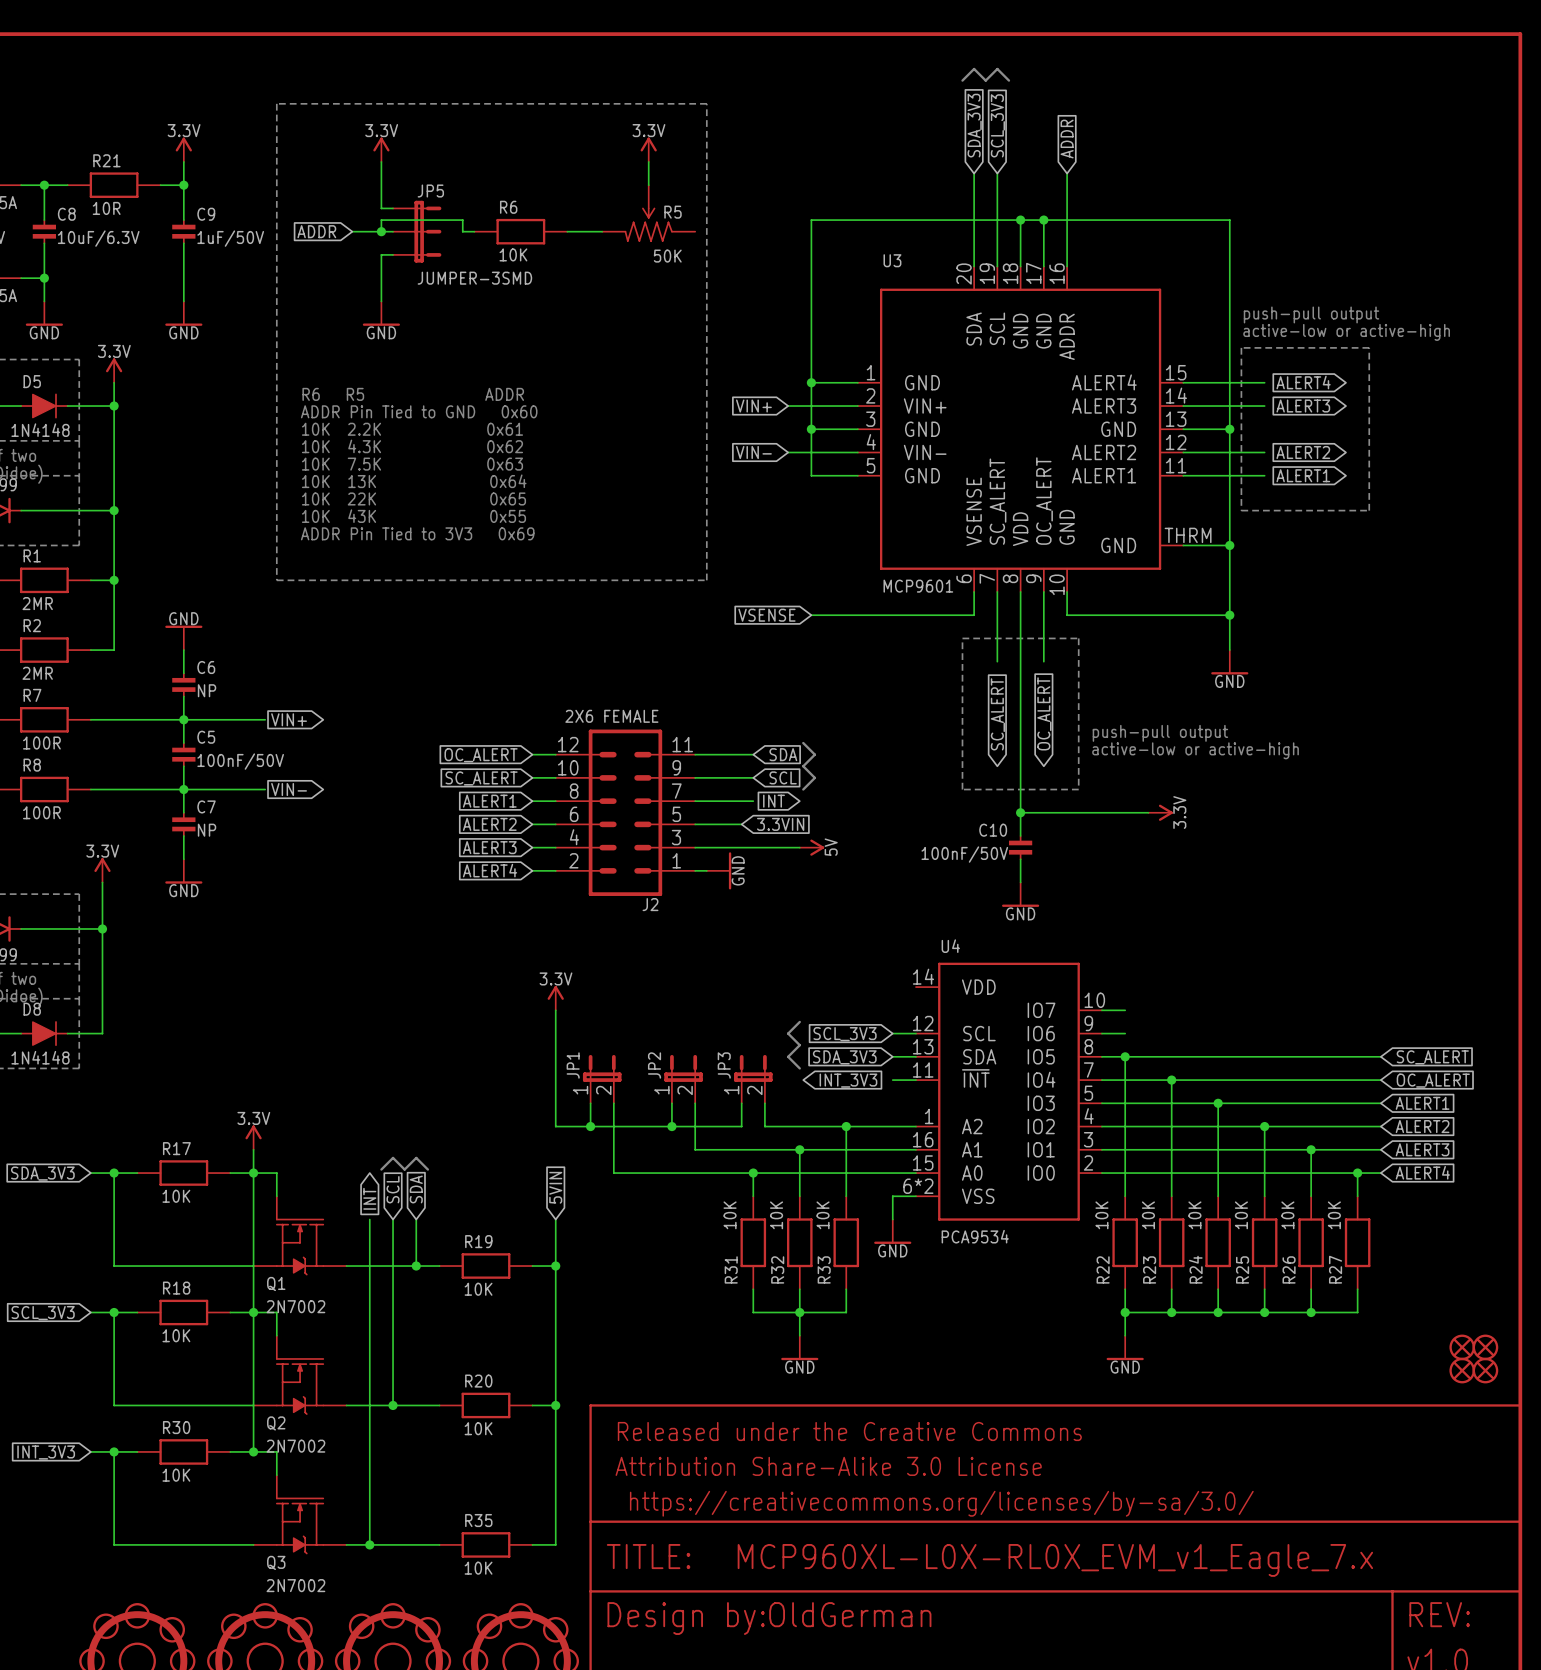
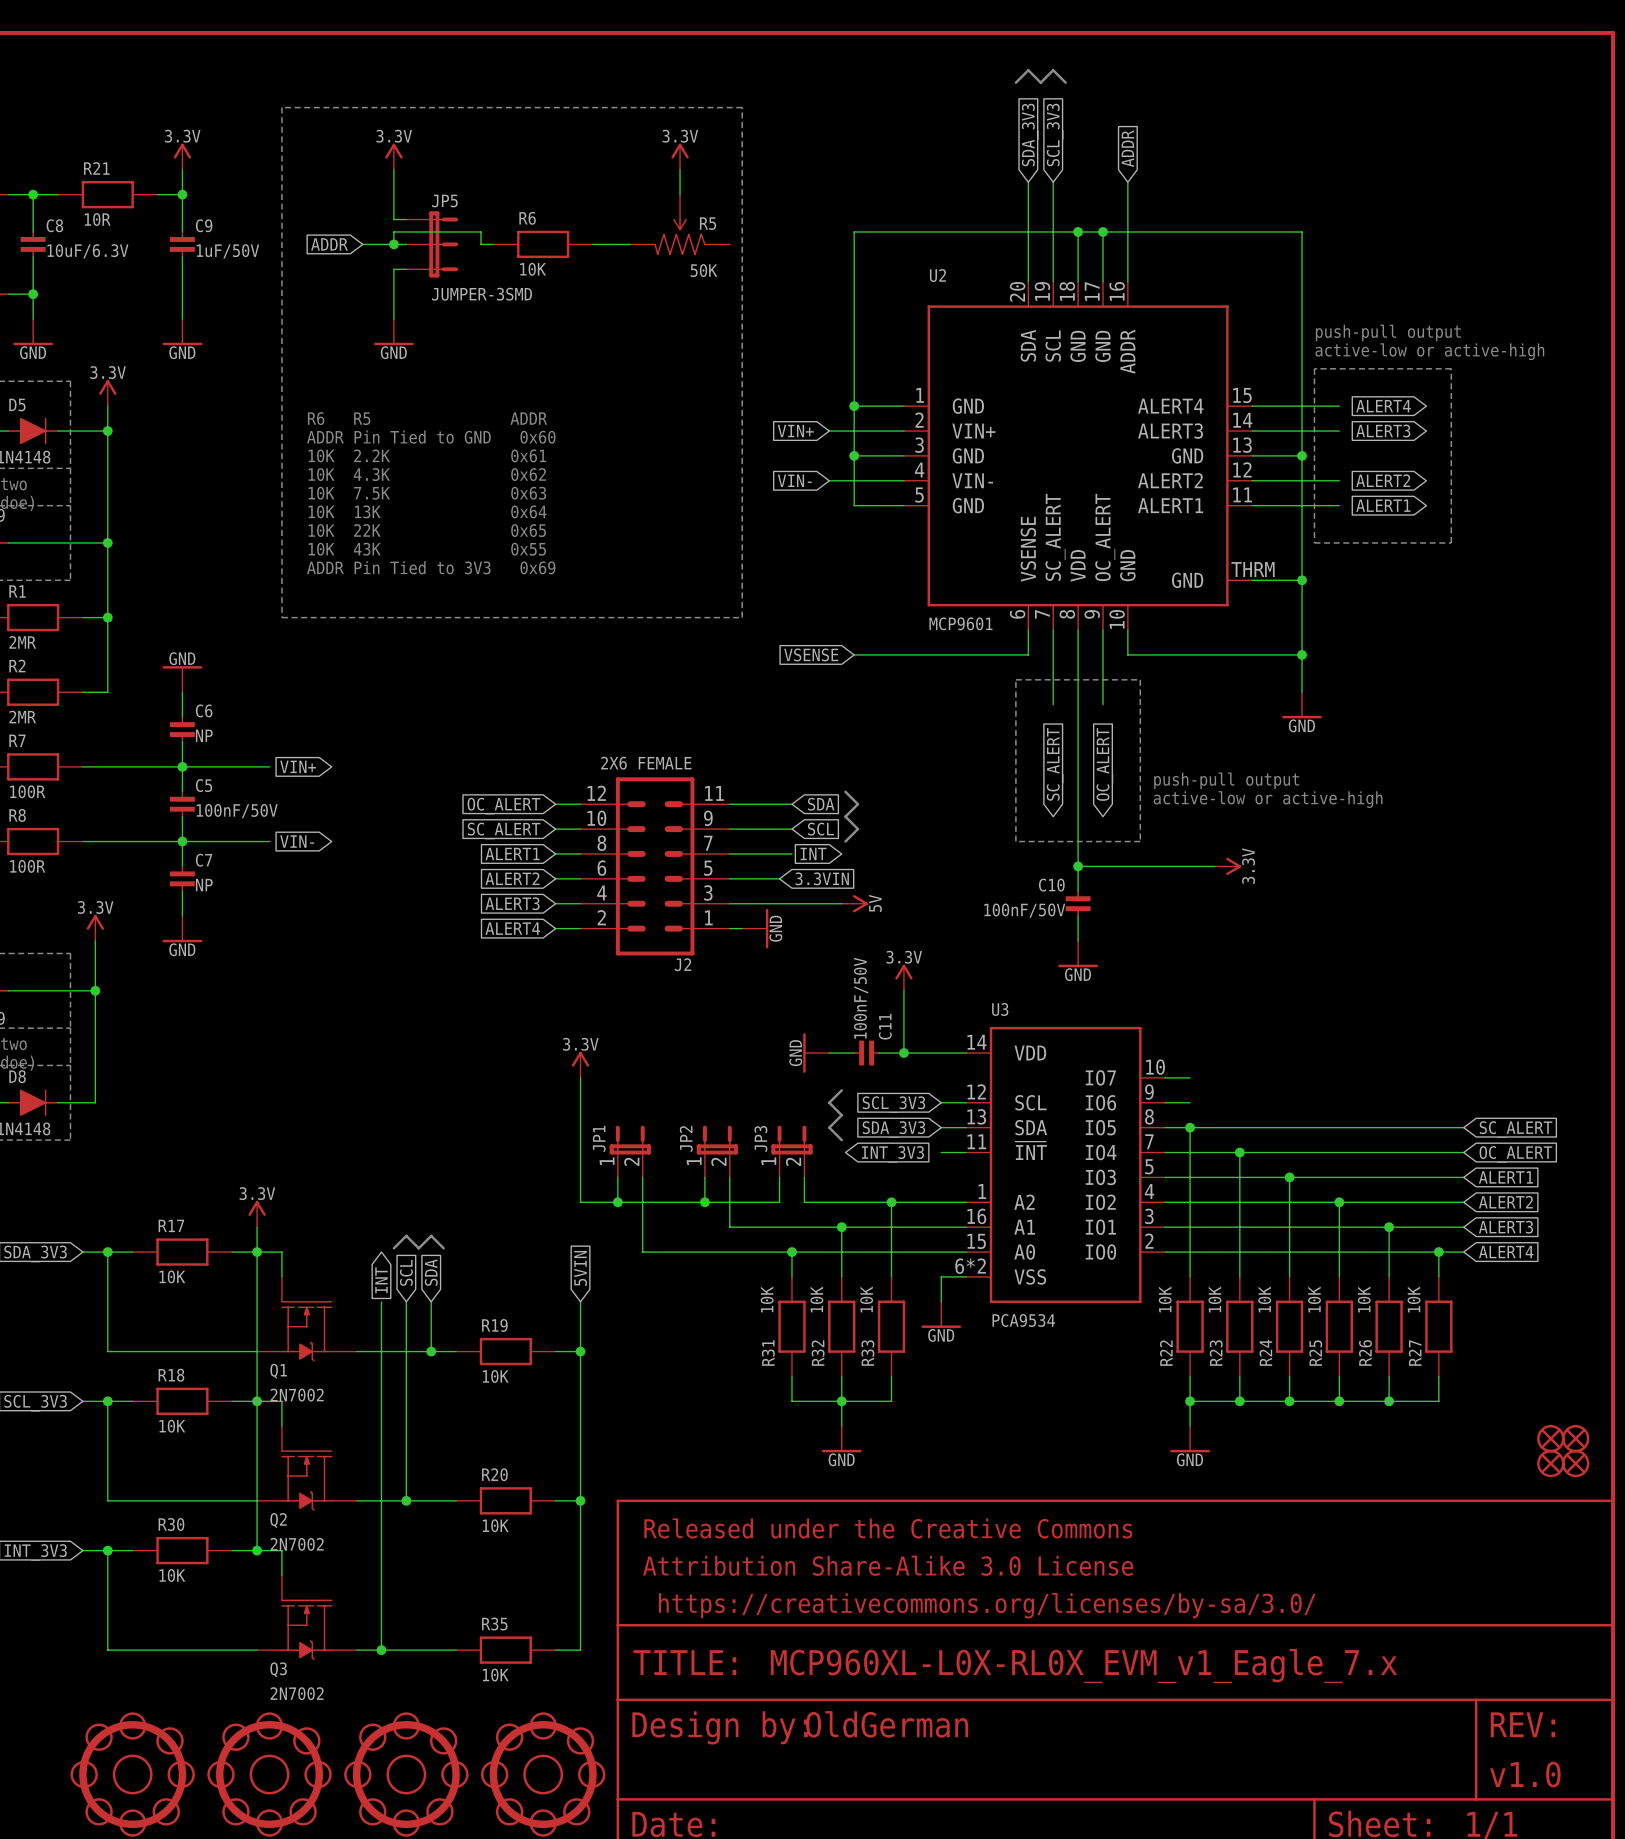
U3 name: U3 (892, 260) -> U2 (937, 275)
power symbol: none -> 3.3V (903, 977)
wire: none -> (903, 990) (903, 1053)
U4 name: U4 (950, 946) -> U3 (1000, 1009)
power symbol: none -> GND (816, 1053)
wire: none -> (829, 1053) (854, 1053)
C11: none -> 100nF/50V (866, 1053)
wire: none -> (879, 1053) (966, 1053)
junction: none -> (903, 1053)

